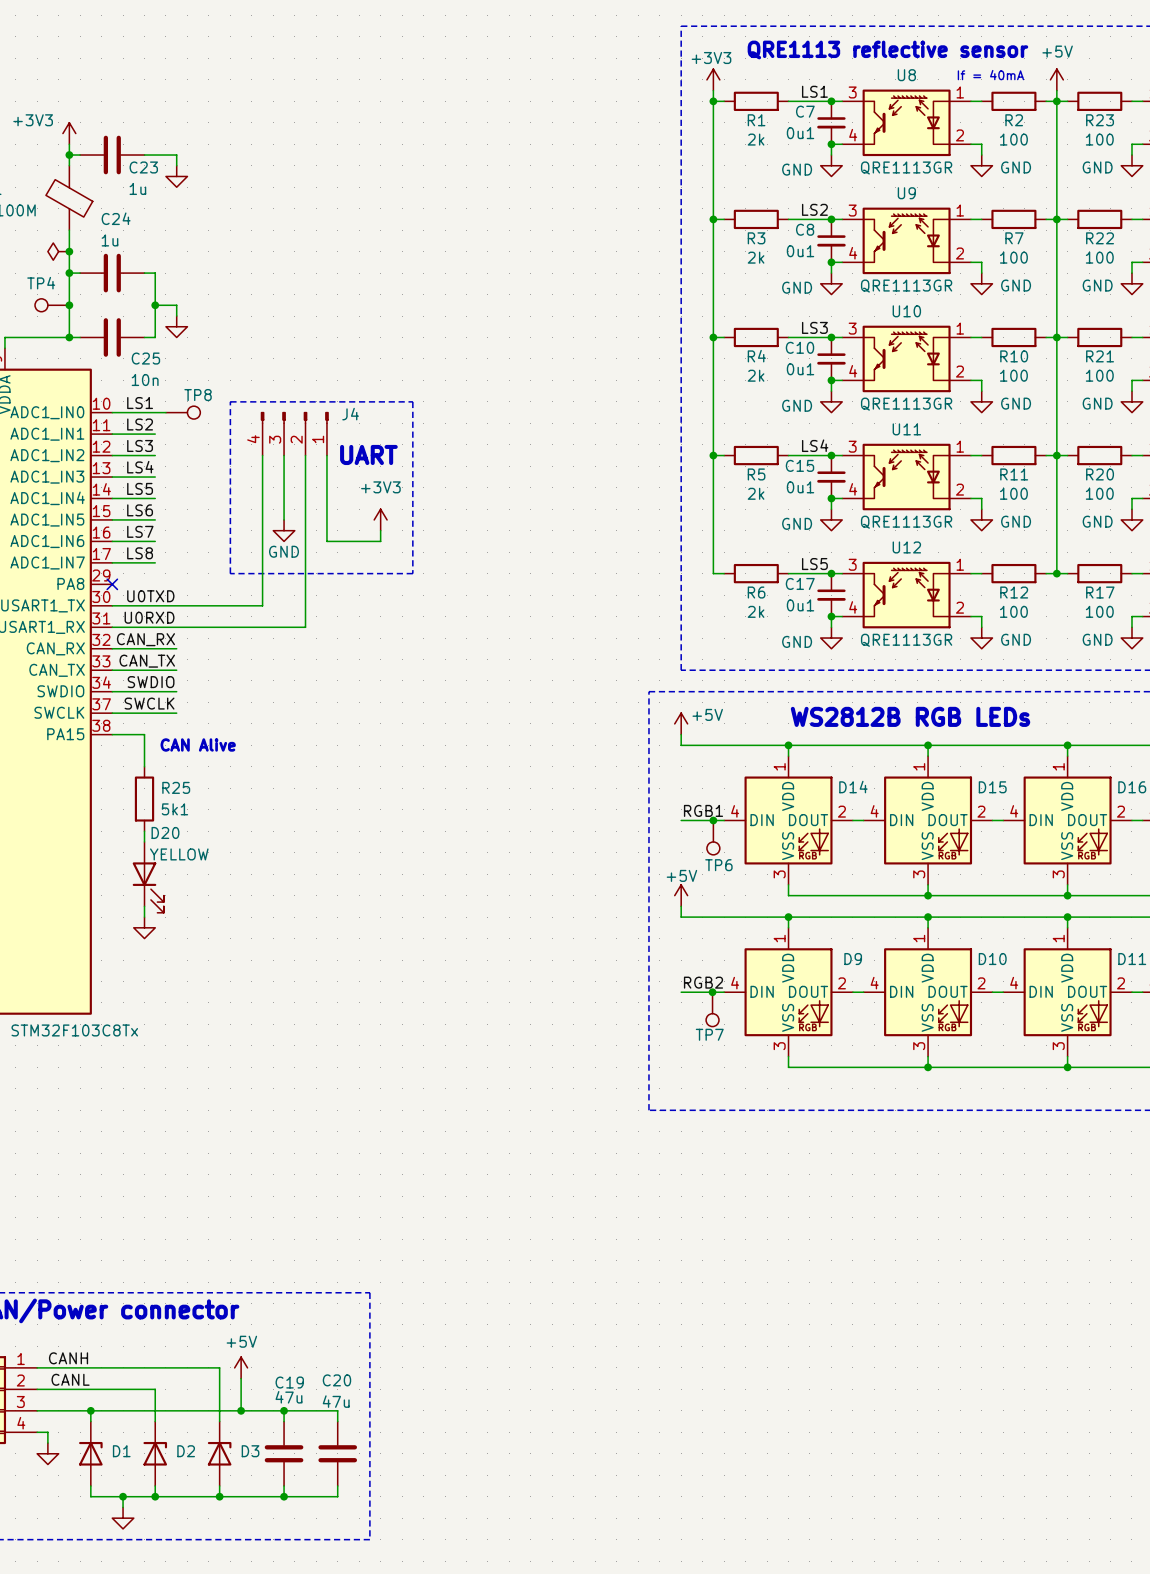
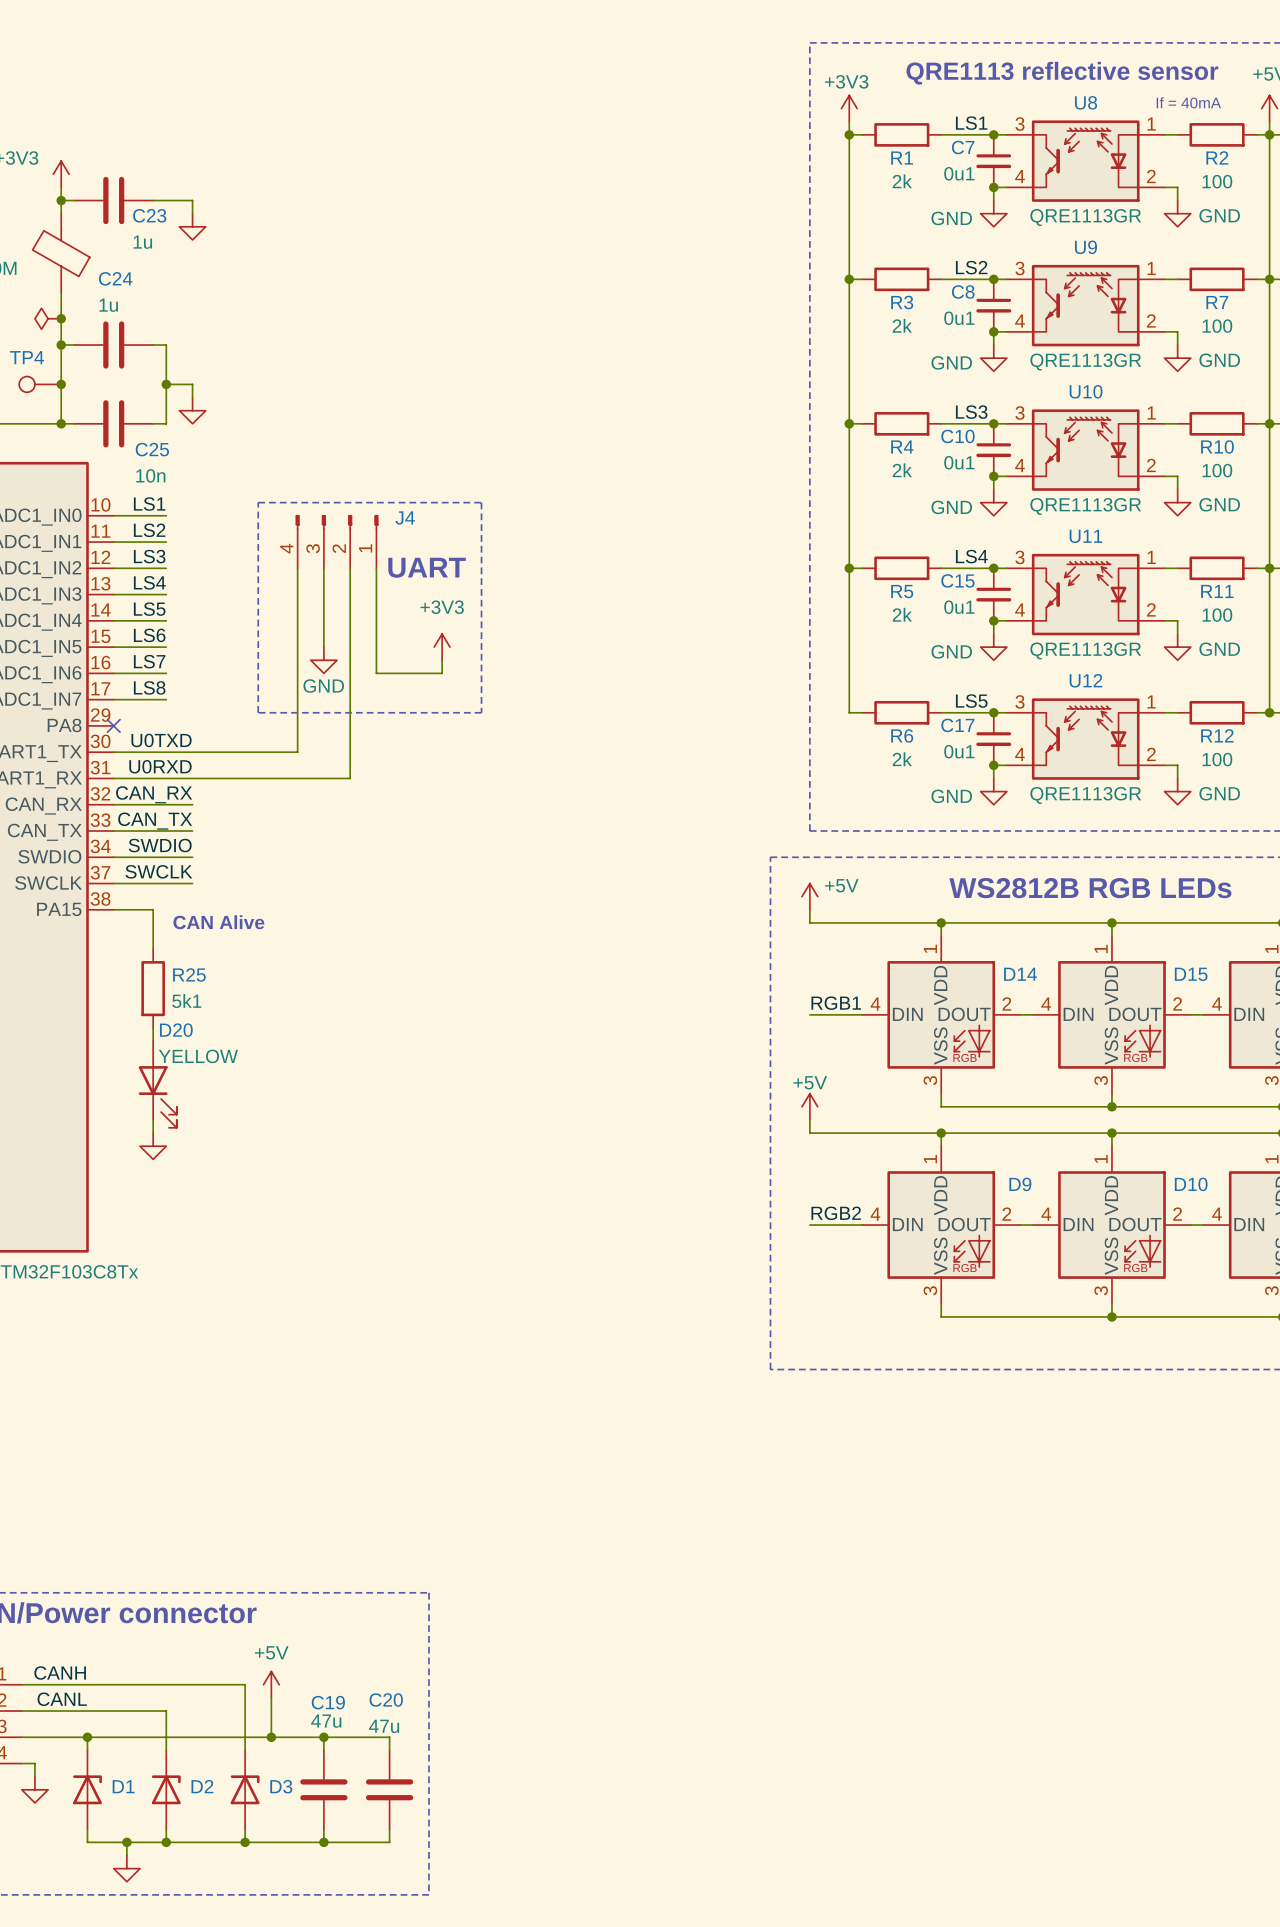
wire: (155, 412) (165, 412) -> none
TP8: (183, 412) -> none
junction: (713, 820) -> none
TP6: (713, 837) -> none
junction: (712, 992) -> none
TP7: (712, 1009) -> none

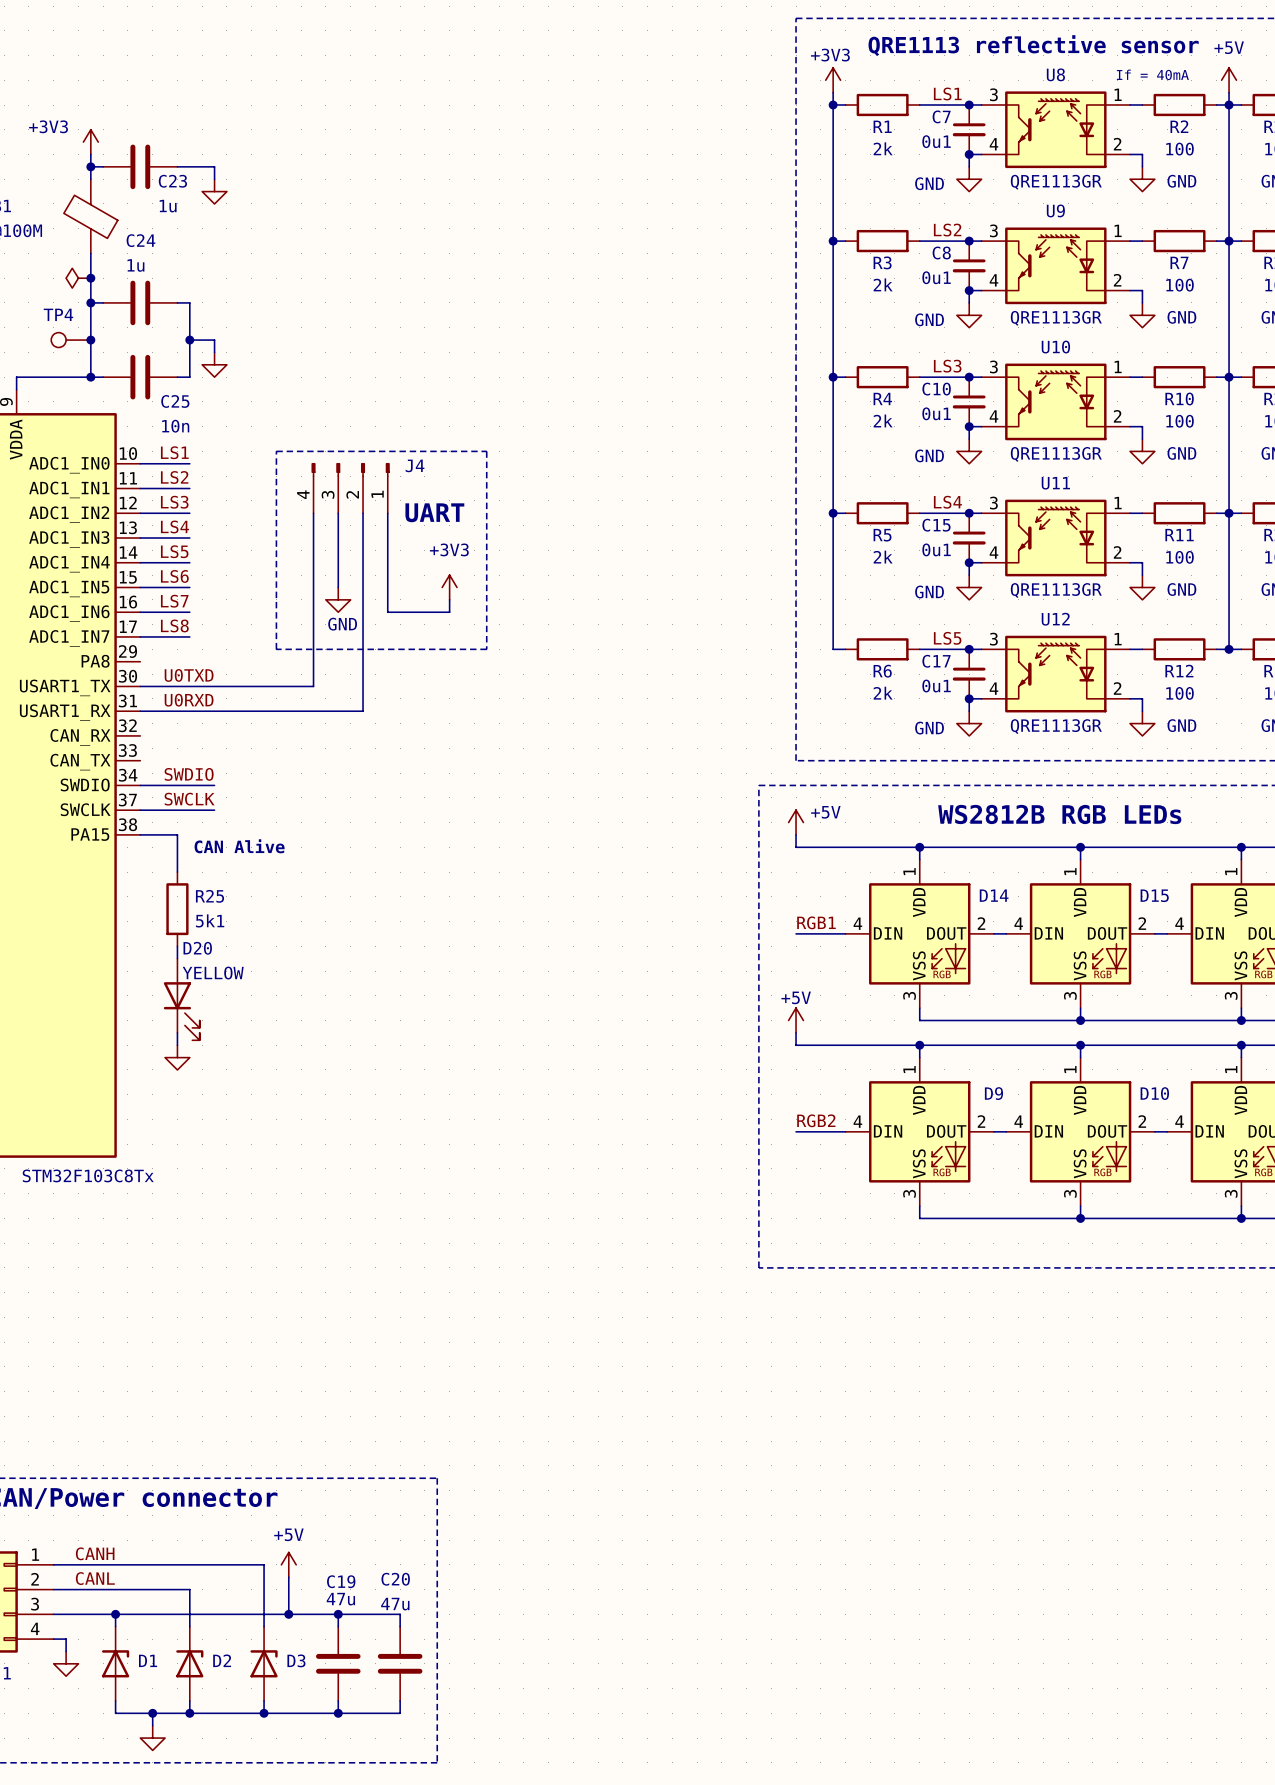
no-connect mark: (113, 725) -> none
label: CAN_RX (154, 794) -> none
wire: (113, 804) (192, 804) -> none
label: CAN_TX (155, 821) -> none
wire: (113, 831) (192, 831) -> none

